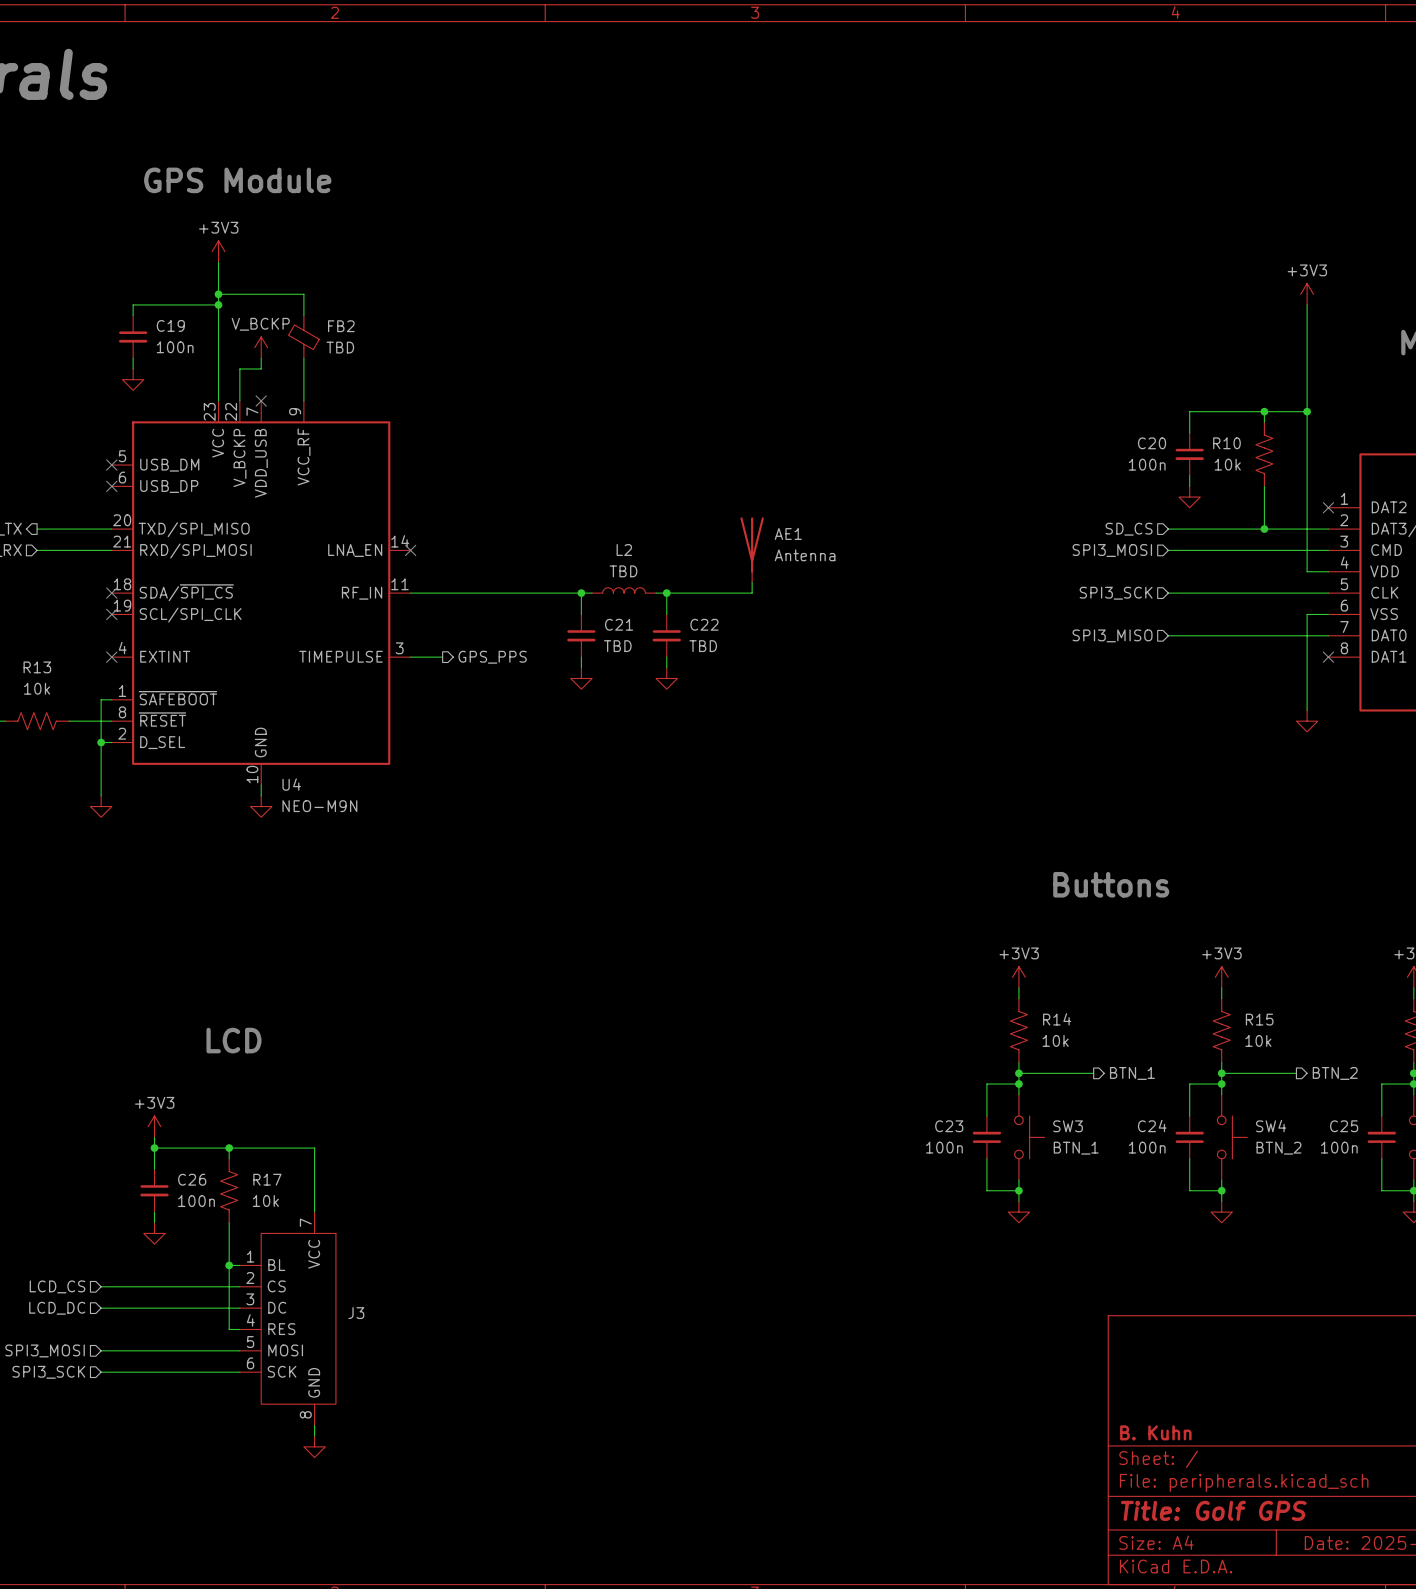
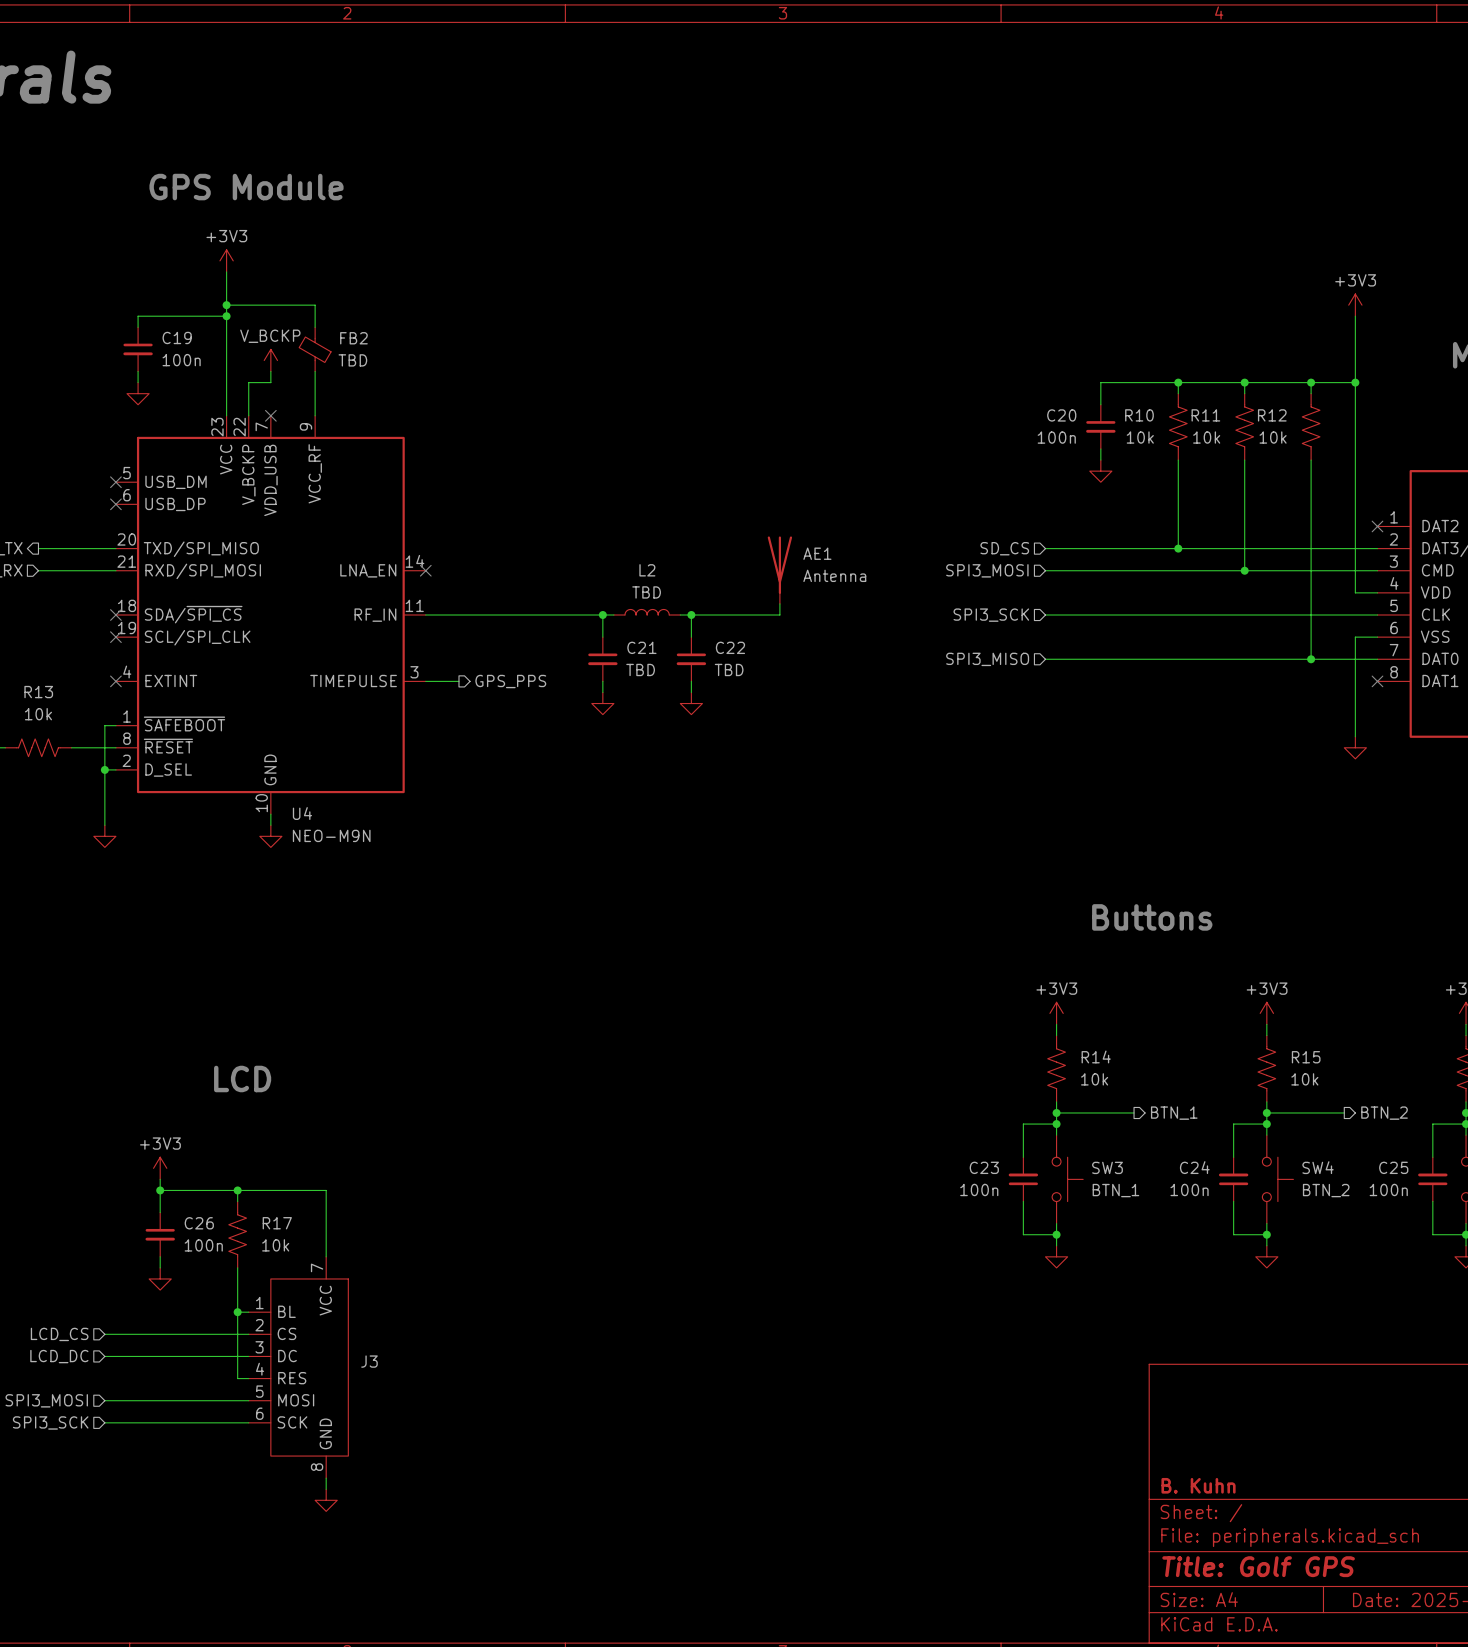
junction: none -> (1178, 382)
wire: none -> (1244, 382) (1244, 393)
junction: none -> (1244, 382)
wire: none -> (1311, 382) (1311, 393)
junction: none -> (1311, 382)
wire: none -> (1355, 382) (1100, 382) (1100, 404)
junction: none -> (1355, 382)
R11: none -> 10k (1244, 426)
wire: (1264, 411) (1264, 422) -> (1178, 382) (1178, 393)
junction: (1264, 411) -> none
R12: none -> 10k (1311, 426)
wire: (1307, 411) (1189, 411) (1189, 433) -> none
junction: (1307, 411) -> none
wire: none -> (1178, 460) (1178, 548)
wire: none -> (1244, 460) (1244, 570)
wire: none -> (1311, 460) (1311, 504)
C20 position: (1189, 454) -> (1100, 426)
R10 position: (1264, 454) -> (1178, 426)
wire: (1189, 475) (1189, 486) -> (1100, 449) (1100, 460)
power symbol position: (1189, 497) -> (1100, 471)
wire: none -> (1045, 548) (1211, 548)
hierarchical label position: SD_CS (1129, 529) -> SD_CS (1004, 548)
junction: none -> (1178, 548)
wire: none -> (1311, 548) (1311, 659)
junction: (1264, 529) -> none
wire: none -> (1045, 570) (1211, 570)
hierarchical label position: SPI3_MOSI (1112, 550) -> SPI3_MOSI (987, 570)
junction: none -> (1244, 570)
wire: none -> (1045, 615) (1211, 615)
hierarchical label position: SPI3_SCK (1116, 593) -> SPI3_SCK (991, 615)
wire: none -> (1045, 659) (1211, 659)
hierarchical label position: SPI3_MISO (1112, 635) -> SPI3_MISO (987, 659)
junction: none -> (1311, 659)

